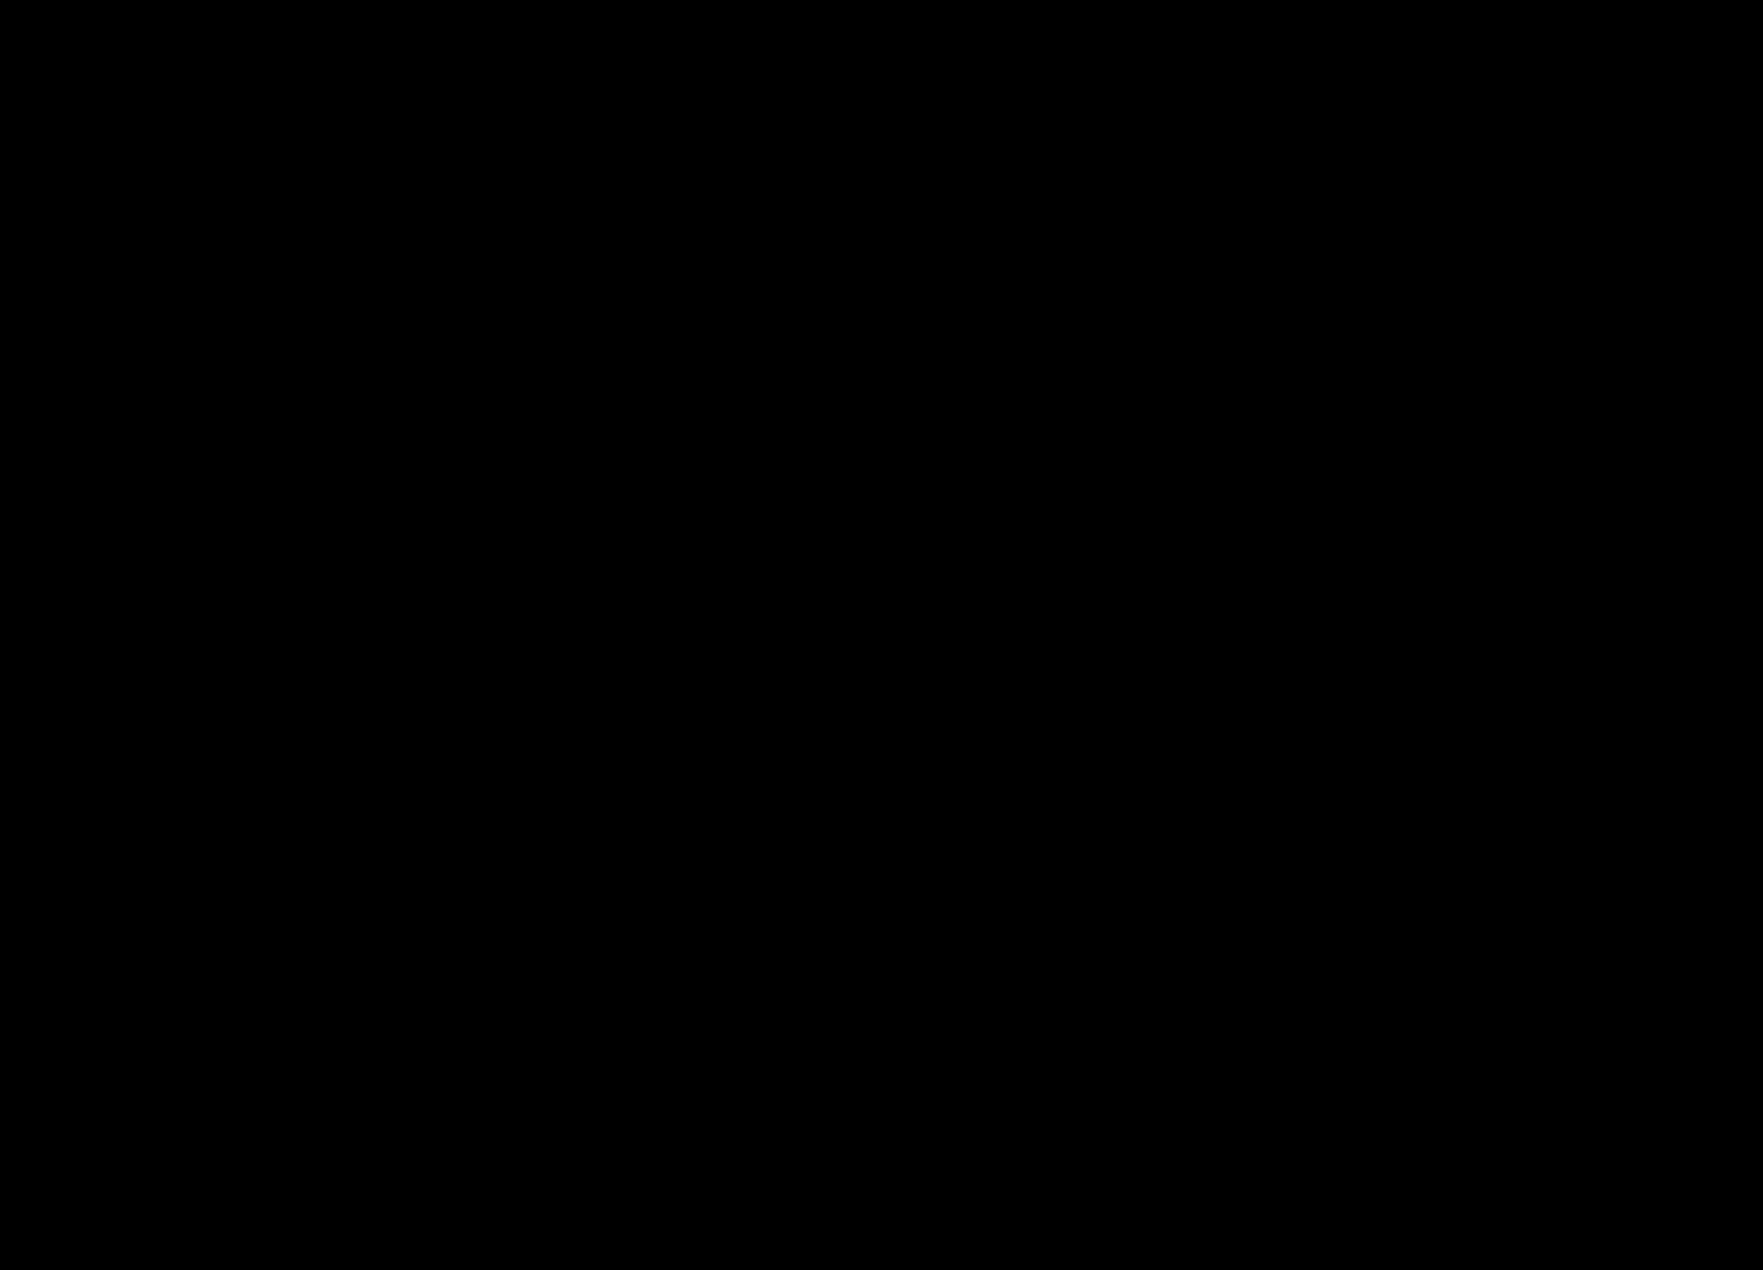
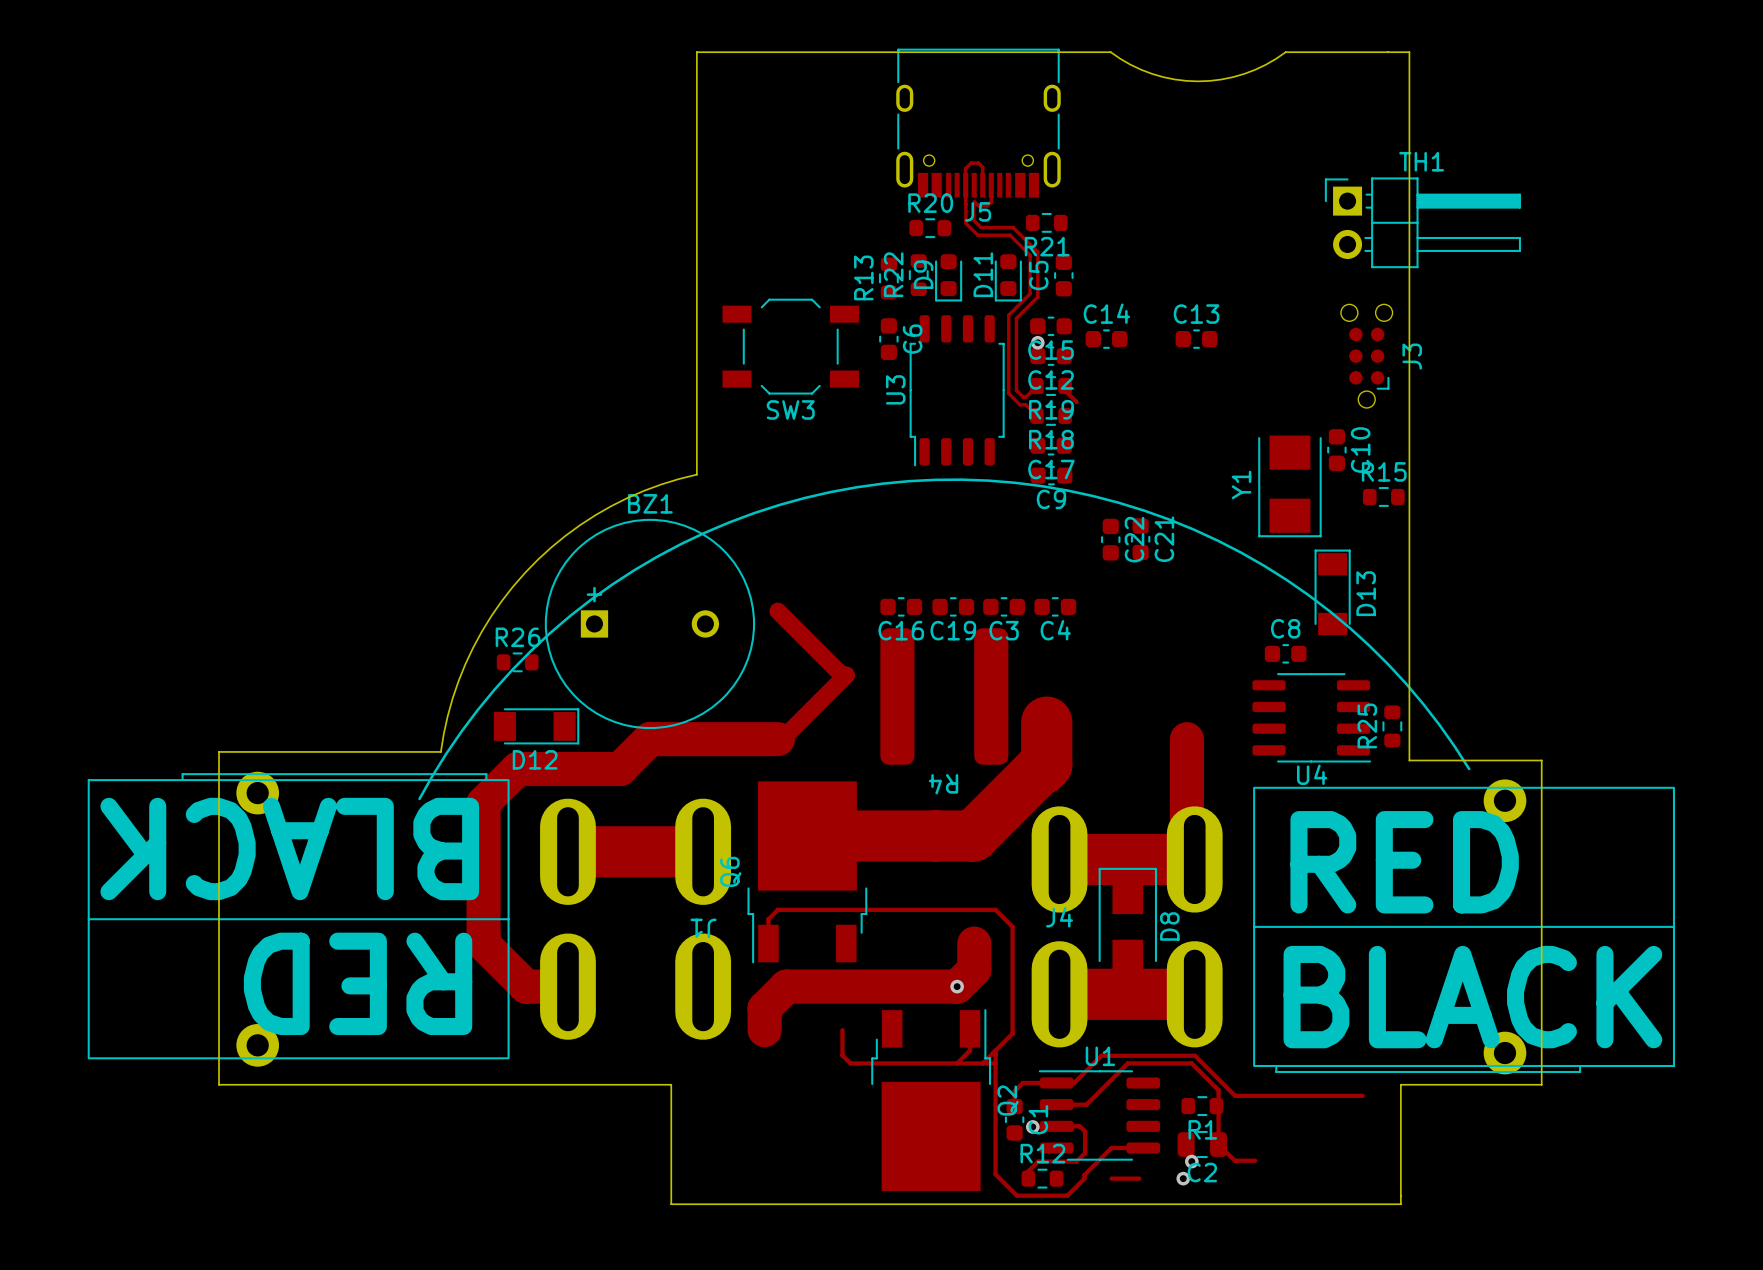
board edge: none -> (696, 52) (1110, 52) (1130, 64) (1152, 73) (1174, 79) (1198, 81) (1221, 79) (1244, 73) (1265, 64) (1285, 52) (1409, 52) (1409, 760) (1541, 760) (1541, 1084) (1400, 1084) (1400, 1204) (671, 1204) (671, 1084) (218, 1084) (218, 751) (440, 751) (452, 698) (473, 647) (491, 616) (525, 572) (551, 547) (595, 515) (644, 490) (696, 474) (696, 52)
J5: none -> (978, 123)
track: none -> (982, 185) (982, 167) (978, 163) (971, 163) (965, 168) (965, 203)
track: none -> (991, 185) (991, 201) (987, 205) (978, 205) (974, 201)
track: none -> (965, 204) (965, 223) (977, 235) (1010, 235) (1030, 255) (1030, 293) (1008, 315) (1008, 393) (1019, 404) (1025, 404) (1036, 415)
track: none -> (973, 204) (973, 220) (981, 227) (1013, 227) (1037, 252) (1037, 297) (1016, 318) (1016, 390) (1023, 397) (1025, 397) (1036, 386)
R21: none -> (1046, 222)
TH1: none -> (1422, 222)
R20: none -> (930, 228)
R22: none -> (918, 275)
C5: none -> (1063, 275)
D9: none -> (948, 277)
D11: none -> (1008, 277)
R13: none -> (888, 278)
C15: none -> (1051, 326)
C6: none -> (888, 339)
C14: none -> (1106, 339)
C13: none -> (1196, 339)
via: none -> (1037, 342)
SW3: none -> (790, 346)
C12: none -> (1051, 356)
J3: none -> (1366, 356)
R19: none -> (1051, 386)
track: none -> (1065, 386) (1065, 390) (1076, 402)
U3: none -> (957, 390)
R18: none -> (1051, 415)
C17: none -> (1051, 445)
C10: none -> (1336, 450)
C9: none -> (1051, 475)
Y1: none -> (1289, 486)
R15: none -> (1383, 496)
C22: none -> (1110, 539)
C21: none -> (1140, 539)
D13: none -> (1332, 592)
C16: none -> (901, 606)
C19: none -> (953, 606)
C3: none -> (1004, 606)
C4: none -> (1055, 606)
track: none -> (777, 611) (841, 675) (846, 675) (782, 739) (649, 739) (620, 769) (517, 769) (483, 803) (483, 943) (526, 986) (567, 986)
BZ1: none -> (649, 623)
C8: none -> (1285, 653)
R26: none -> (517, 662)
R4: none -> (944, 696)
U4: none -> (1311, 717)
track: none -> (1046, 722) (1046, 764) (1040, 769) (973, 836) (807, 836)
D12: none -> (536, 726)
R25: none -> (1392, 726)
track: none -> (1186, 739) (1186, 851) (1194, 859) (1059, 859)
line: none -> (1469, 769) (1423, 704) (1369, 645) (1308, 595) (1241, 552) (1169, 519) (1093, 496) (1015, 482) (935, 479) (856, 487) (779, 505) (704, 532) (634, 569) (570, 616) (512, 670) (461, 731) (419, 798)
track: none -> (567, 851) (703, 851)
Q6: none -> (807, 872)
J1: none -> (409, 919)
D8: none -> (1127, 925)
J4: none -> (1353, 926)
track: none -> (768, 943) (768, 919) (777, 909) (995, 909) (1012, 926) (1012, 1033) (982, 1063)
track: none -> (974, 943) (974, 969) (957, 986) (786, 986) (764, 1008) (764, 1030)
via: none -> (957, 986)
track: none -> (1059, 994) (1194, 994)
track: none -> (970, 1028) (970, 1050) (957, 1063)
track: none -> (842, 1030) (842, 1055) (850, 1063) (995, 1063)
track: none -> (995, 1050) (995, 1174) (1016, 1195) (1067, 1195) (1084, 1178) (1084, 1175) (1111, 1147) (1143, 1147)
track: none -> (1362, 1095) (1235, 1095) (1194, 1055) (1101, 1055) (1074, 1082) (1022, 1082) (1014, 1091) (1014, 1106)
Q2: none -> (931, 1100)
track: none -> (1056, 1104) (1086, 1104) (1127, 1063) (1191, 1063) (1218, 1090) (1218, 1144) (1234, 1160) (1255, 1160)
R1: none -> (1202, 1106)
U1: none -> (1099, 1115)
C1: none -> (1014, 1119)
track: none -> (1032, 1126) (1079, 1126) (1085, 1131) (1085, 1153) (1076, 1161) (1038, 1161) (1028, 1171) (1028, 1178)
via: none -> (1032, 1126)
C2: none -> (1202, 1144)
via: none -> (1191, 1161)
R12: none -> (1042, 1178)
track: none -> (1111, 1178) (1139, 1178)
via: none -> (1183, 1178)

